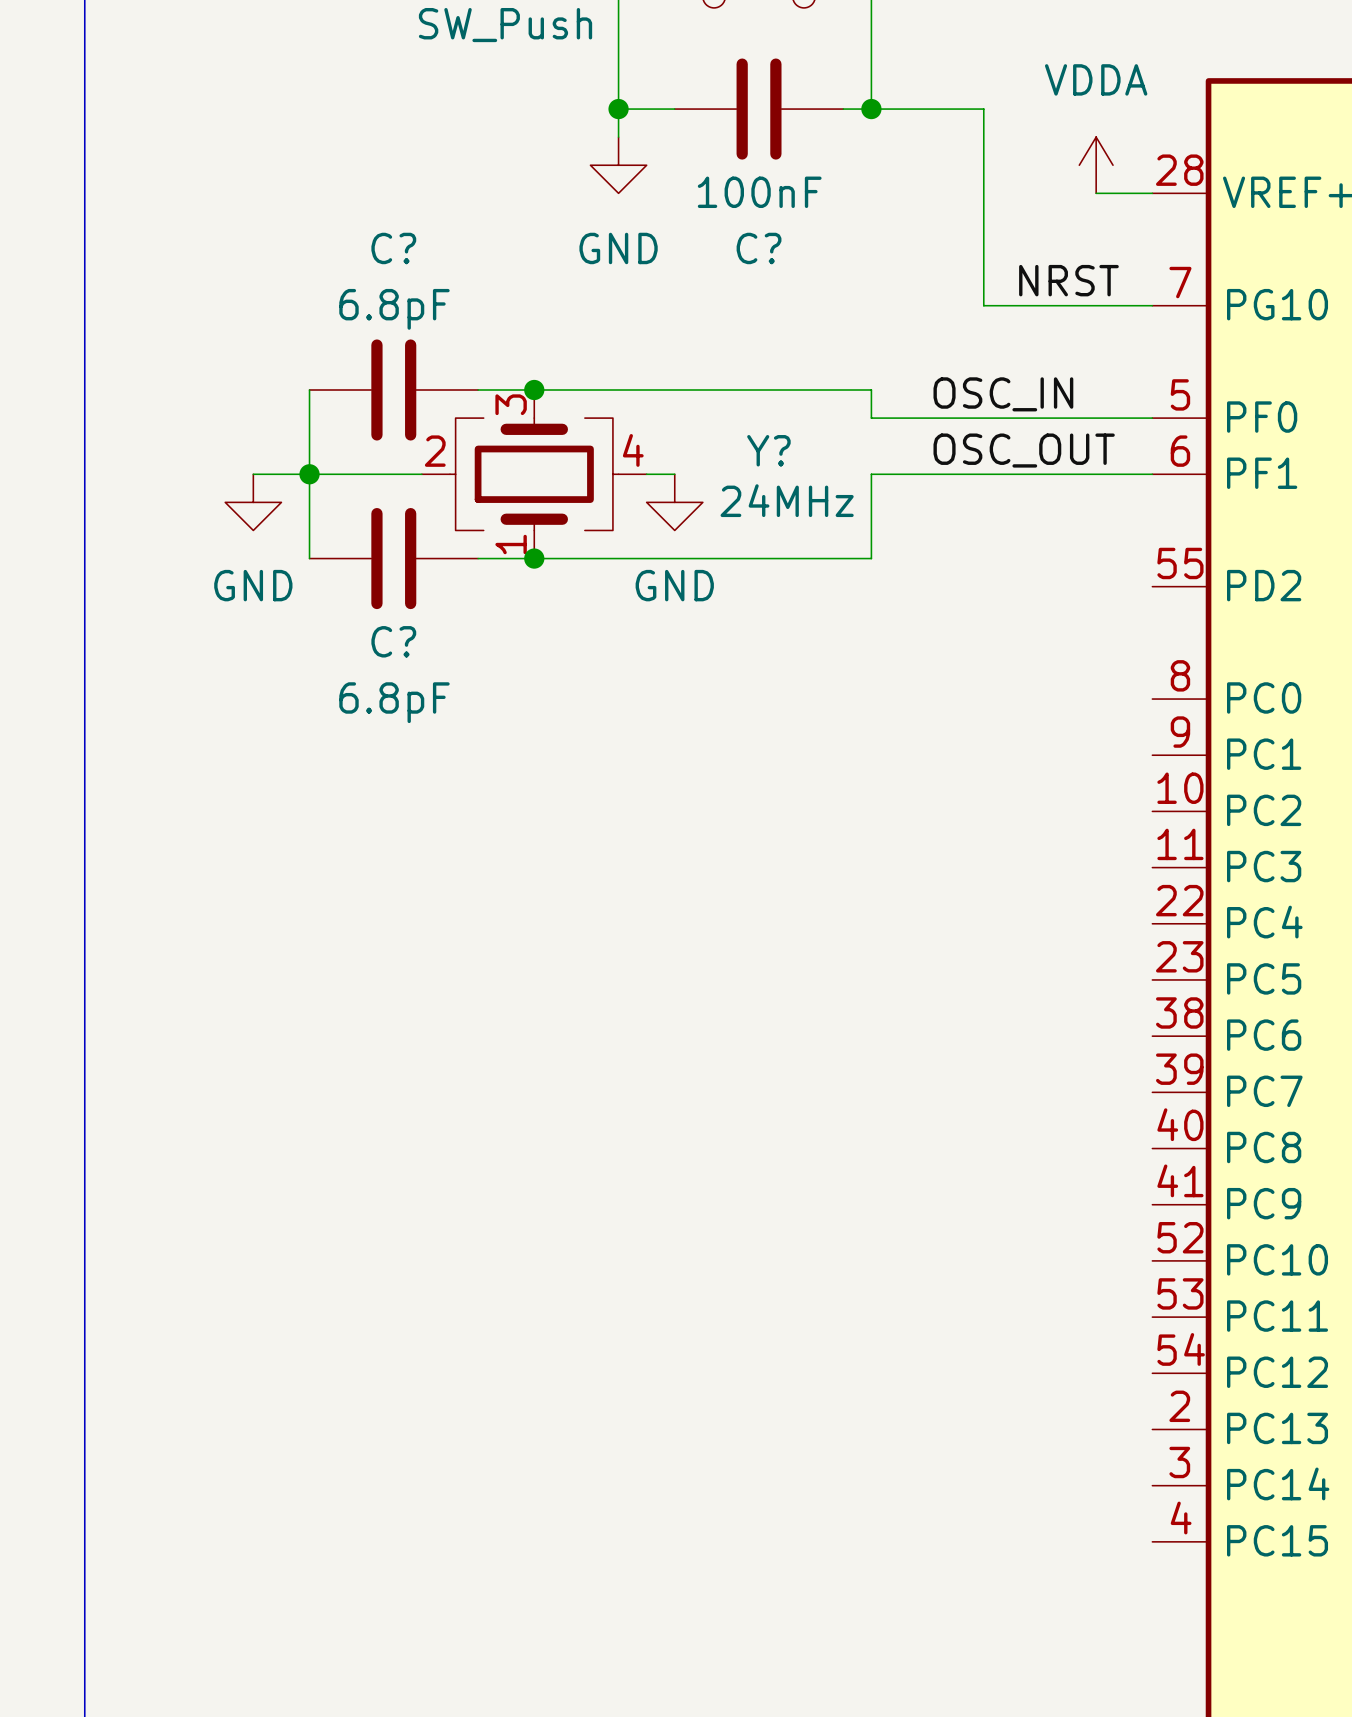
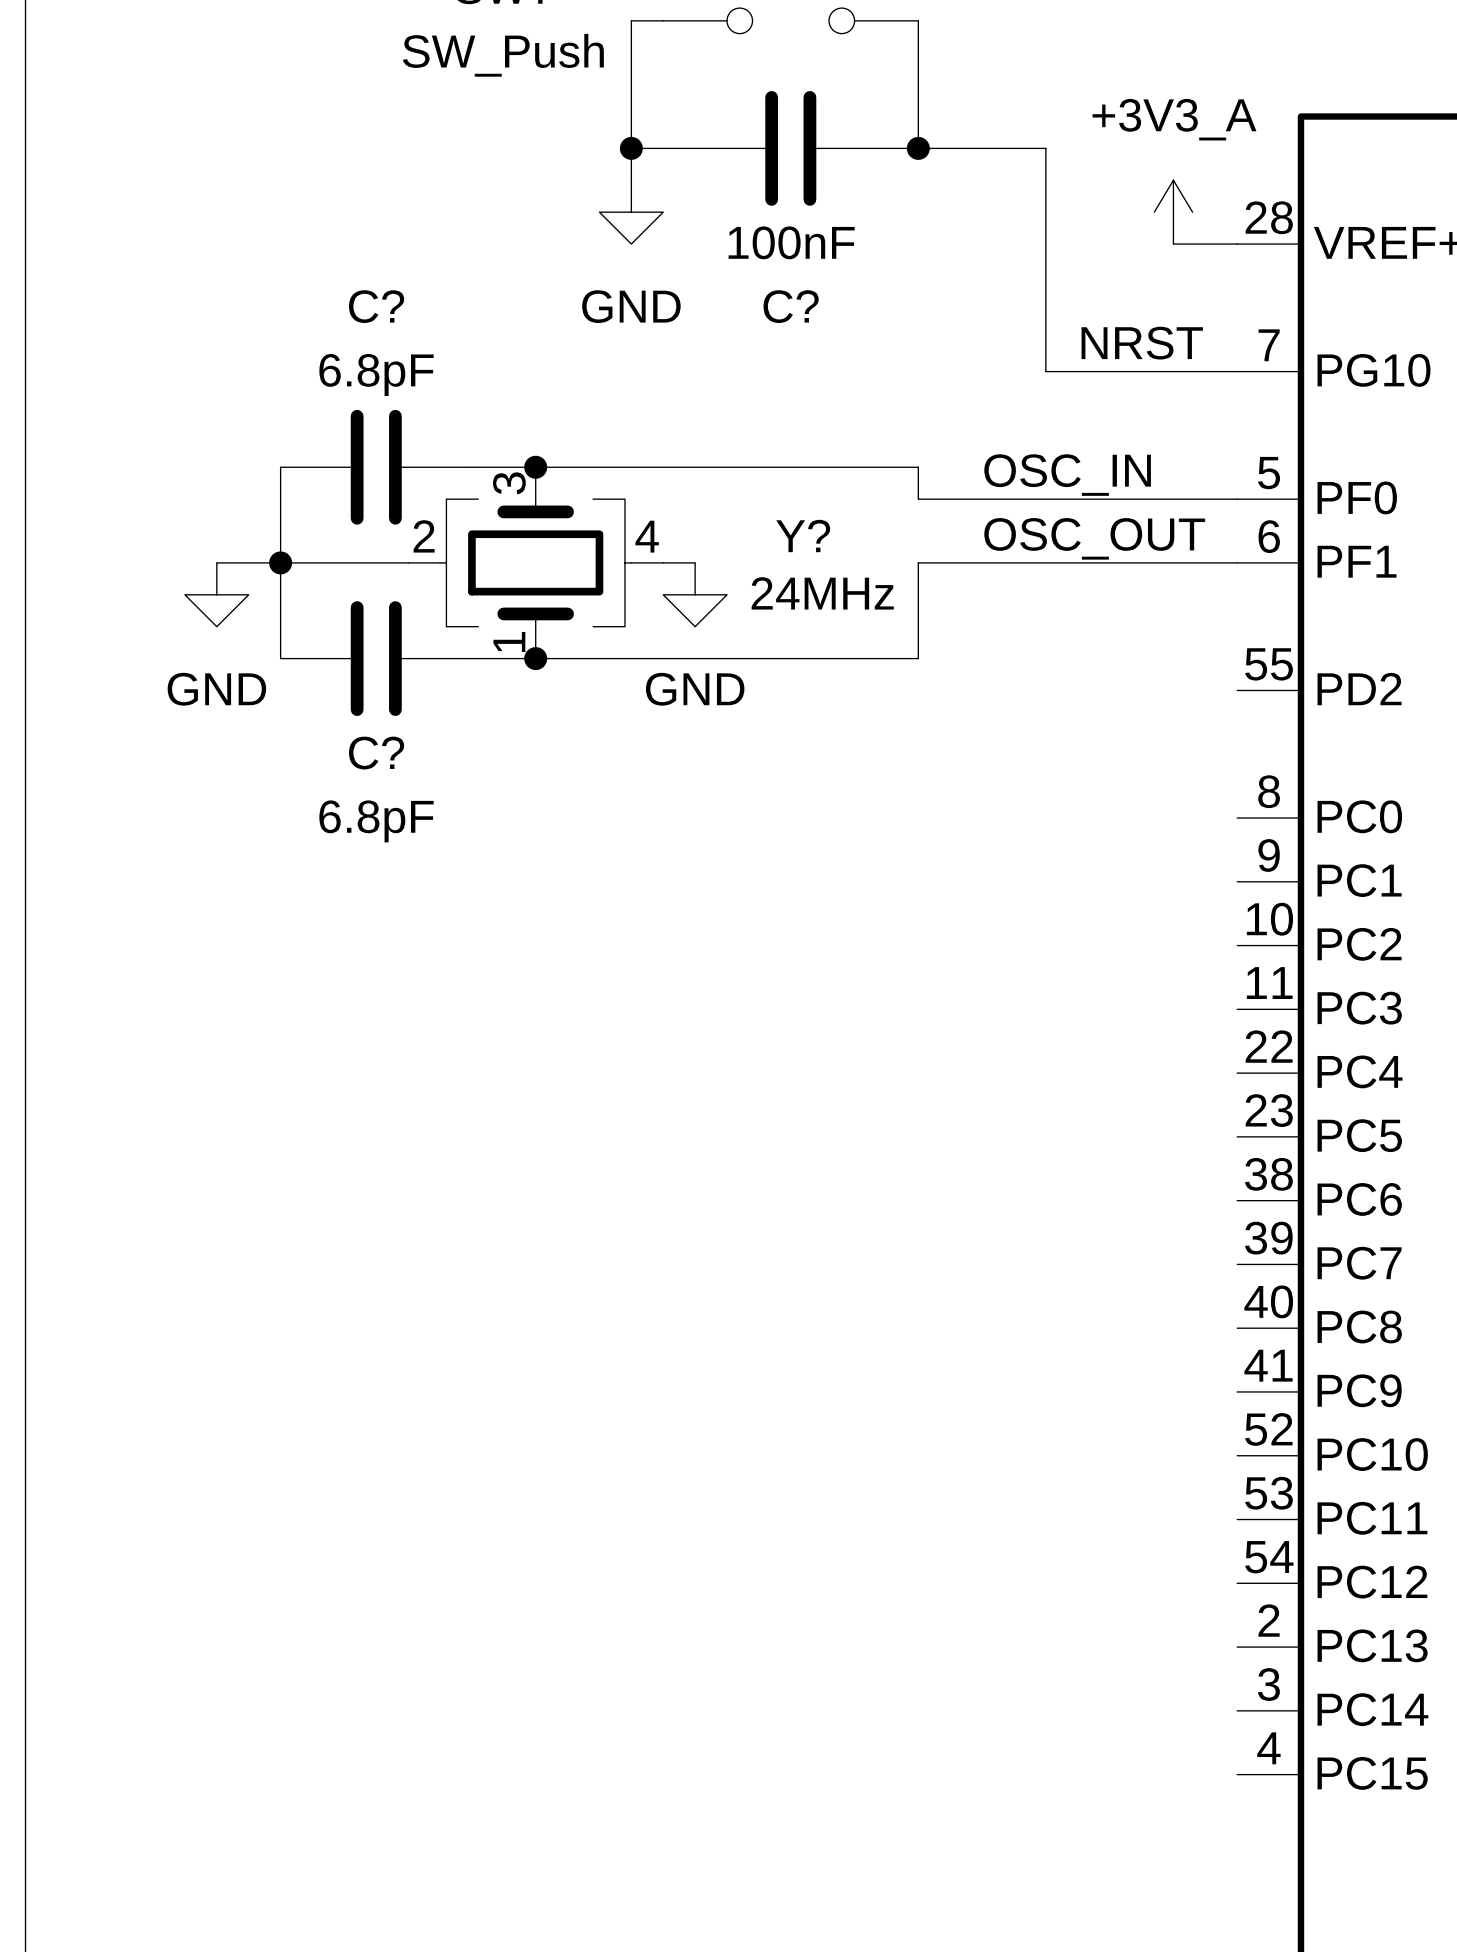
power symbol: VDDA (1096, 165) -> +3V3_A (1173, 212)

